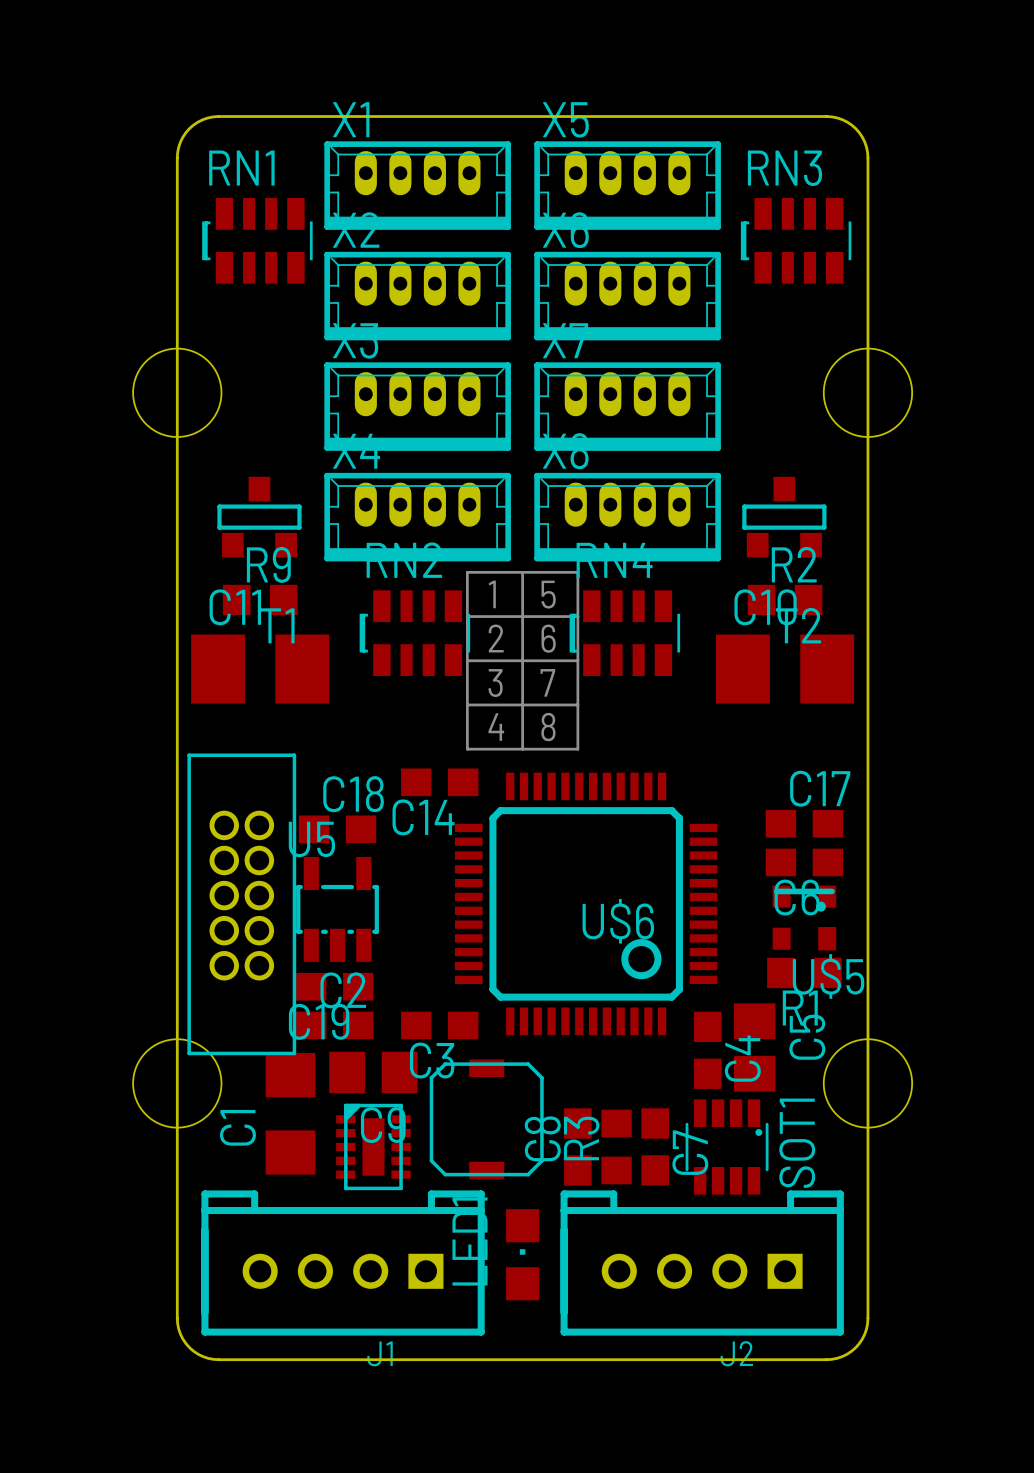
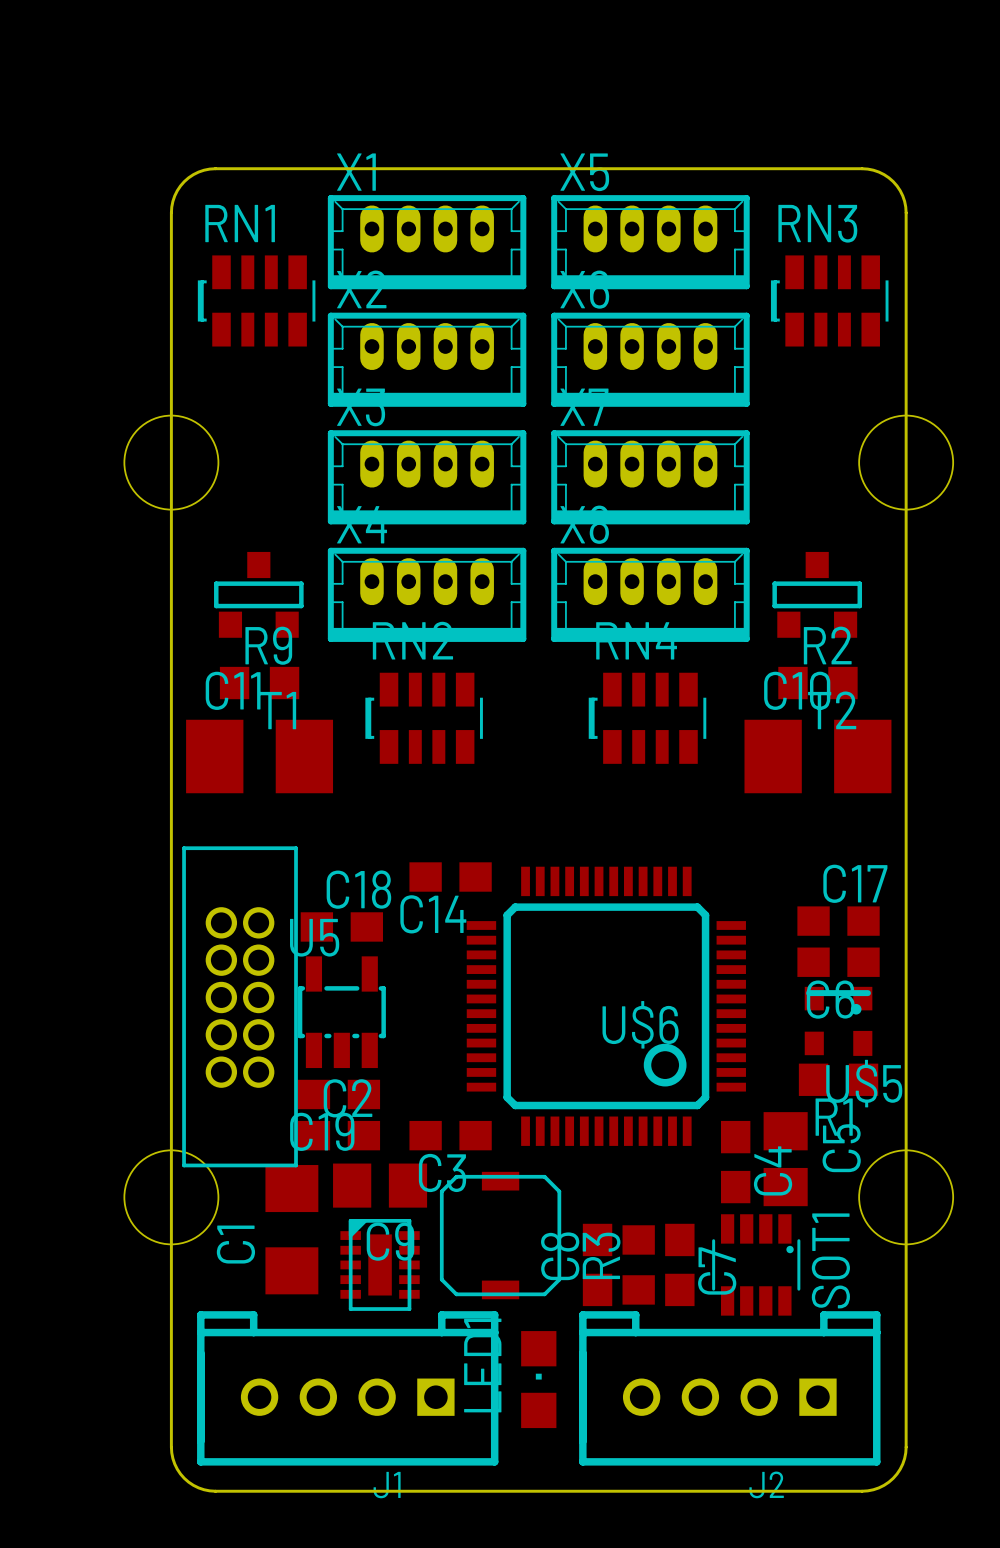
line: (467, 572) (577, 572) (577, 749) (467, 749) (467, 572) -> none
line: (522, 572) (522, 749) -> none
text: 1 (492, 594) -> none
text: 5 (548, 594) -> none
line: (467, 616) (577, 616) -> none
text: 2 (496, 638) -> none
text: 6 (548, 638) -> none
line: (467, 660) (577, 660) -> none
text: 7 (547, 682) -> none
text: 3 (495, 683) -> none
line: (467, 704) (577, 704) -> none
text: 4 (496, 727) -> none
text: 8 (548, 727) -> none

